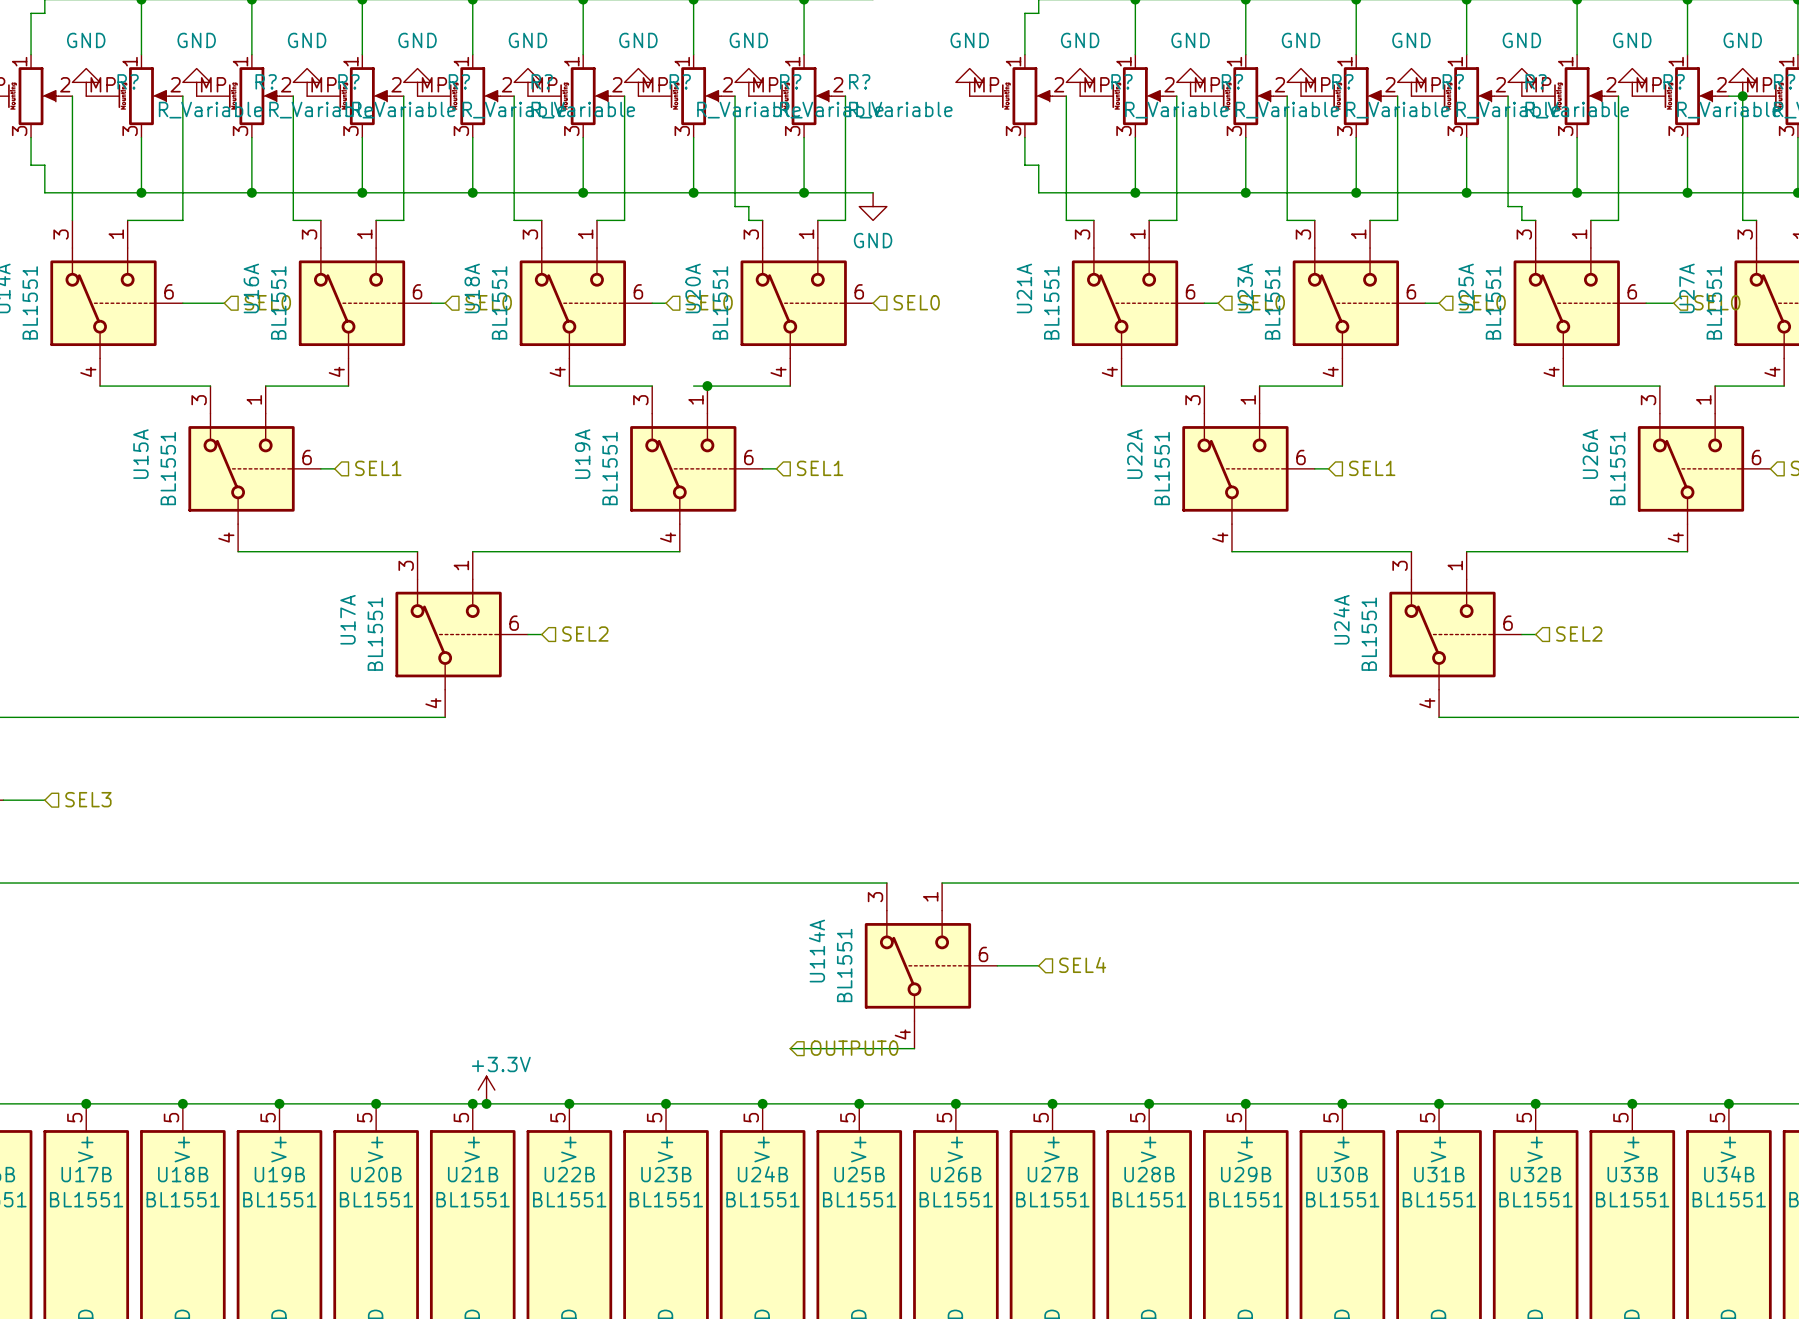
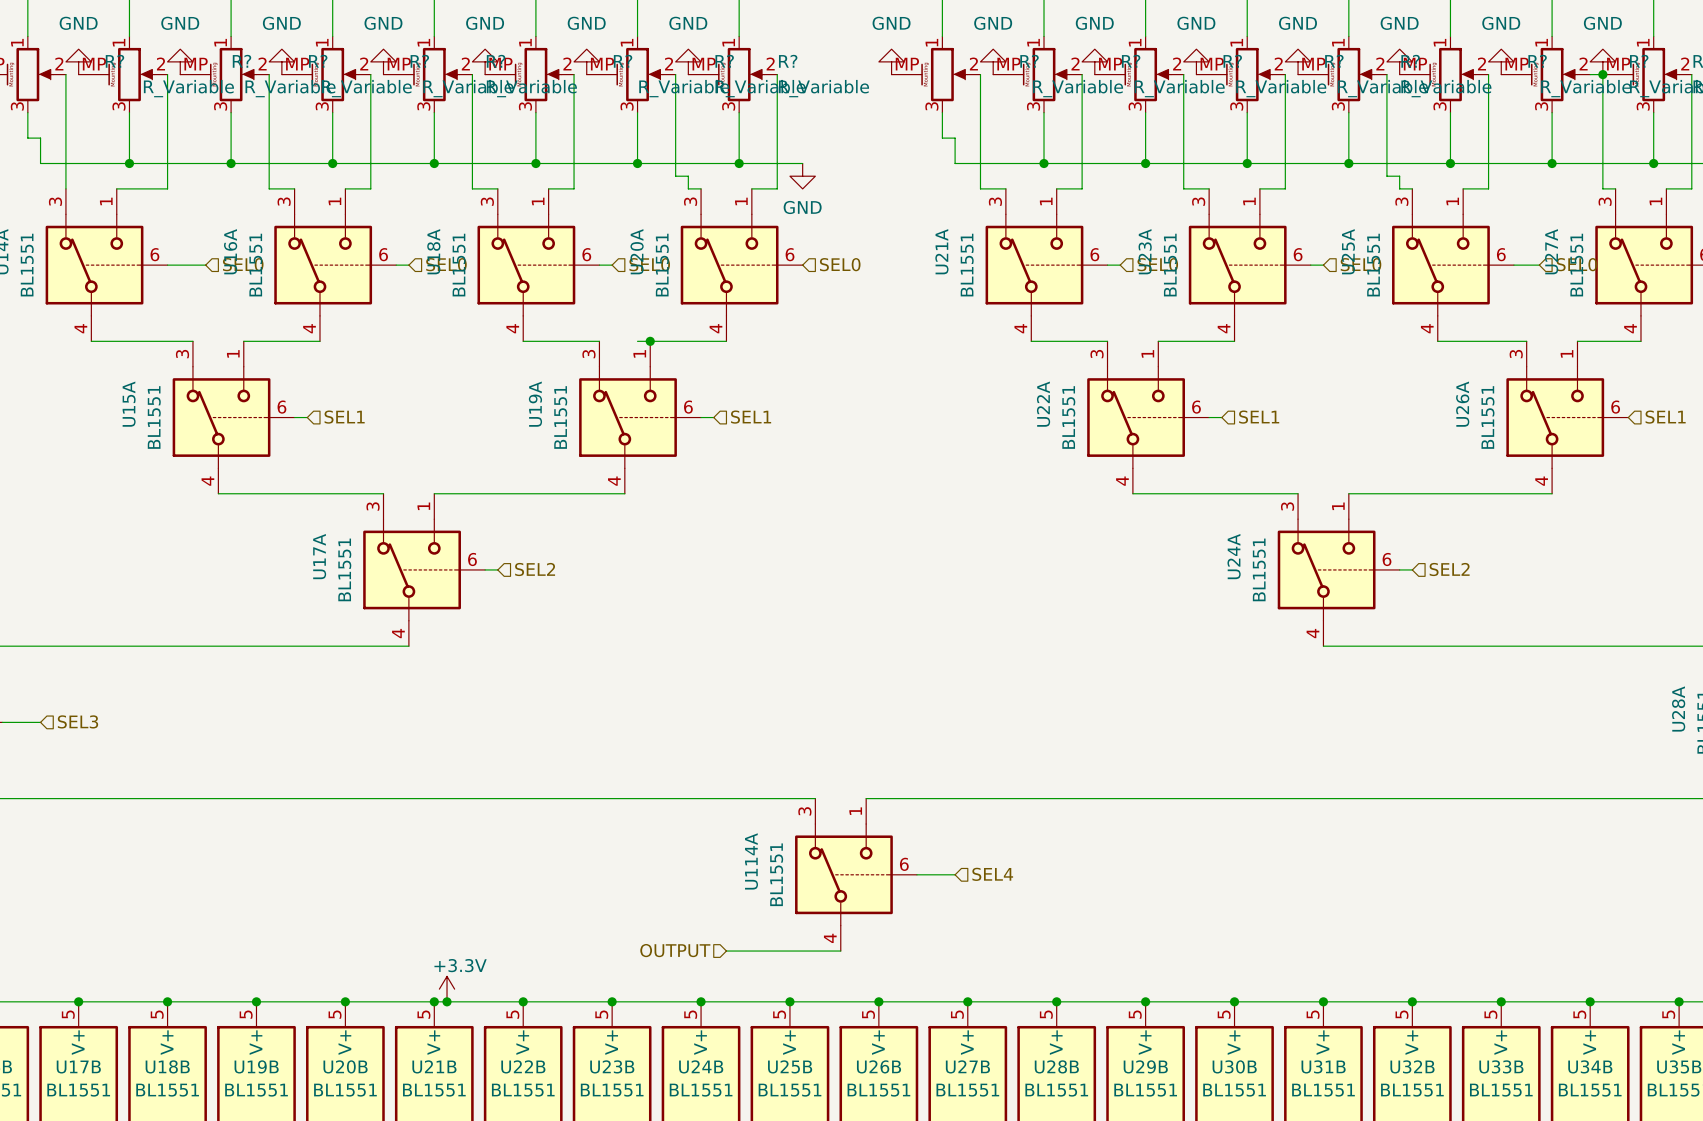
hierarchical label: none -> OUTPUT (675, 950)
hierarchical label: OUTPUT0 (854, 1048) -> none

